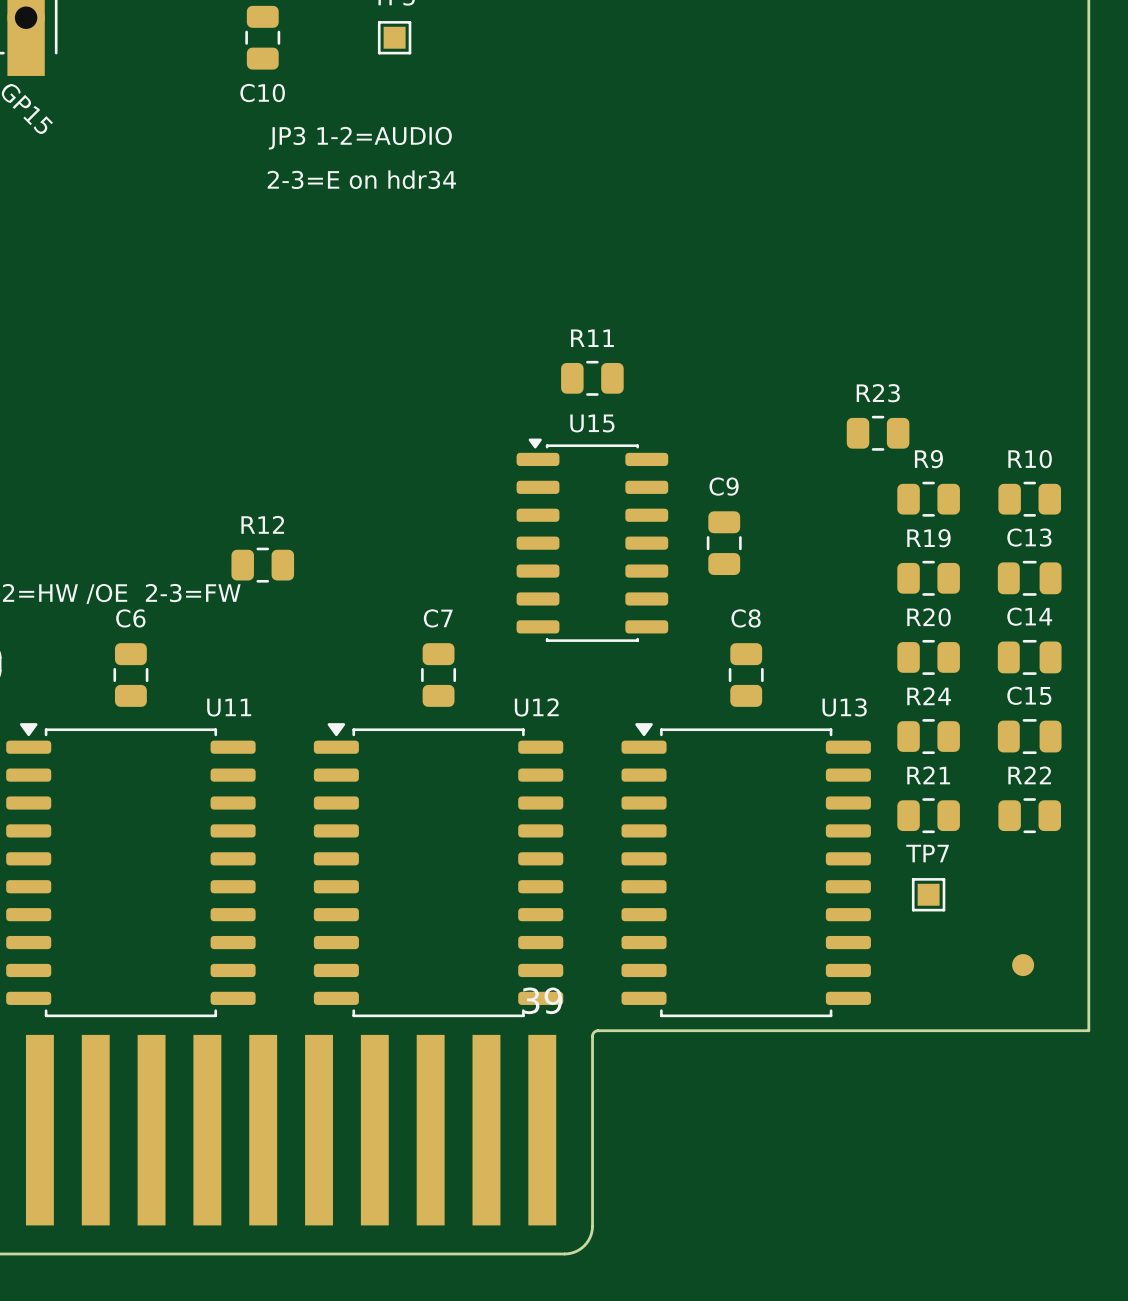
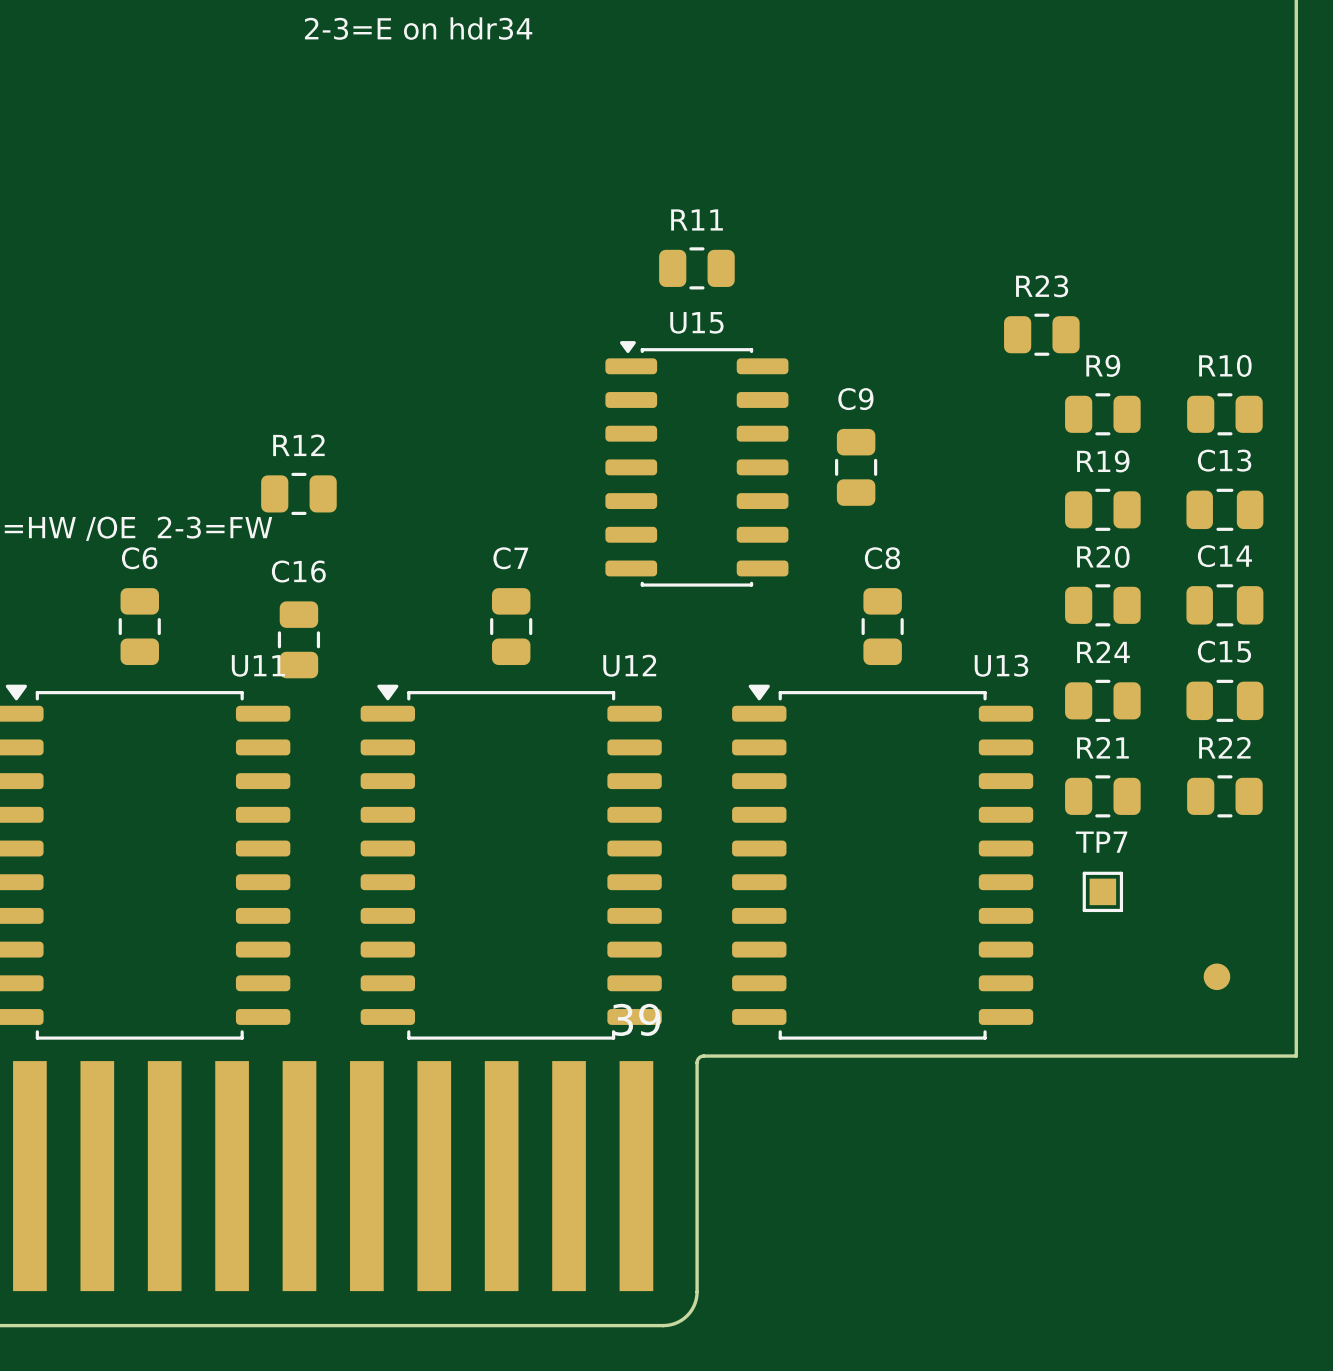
C16: none -> (298, 639)

